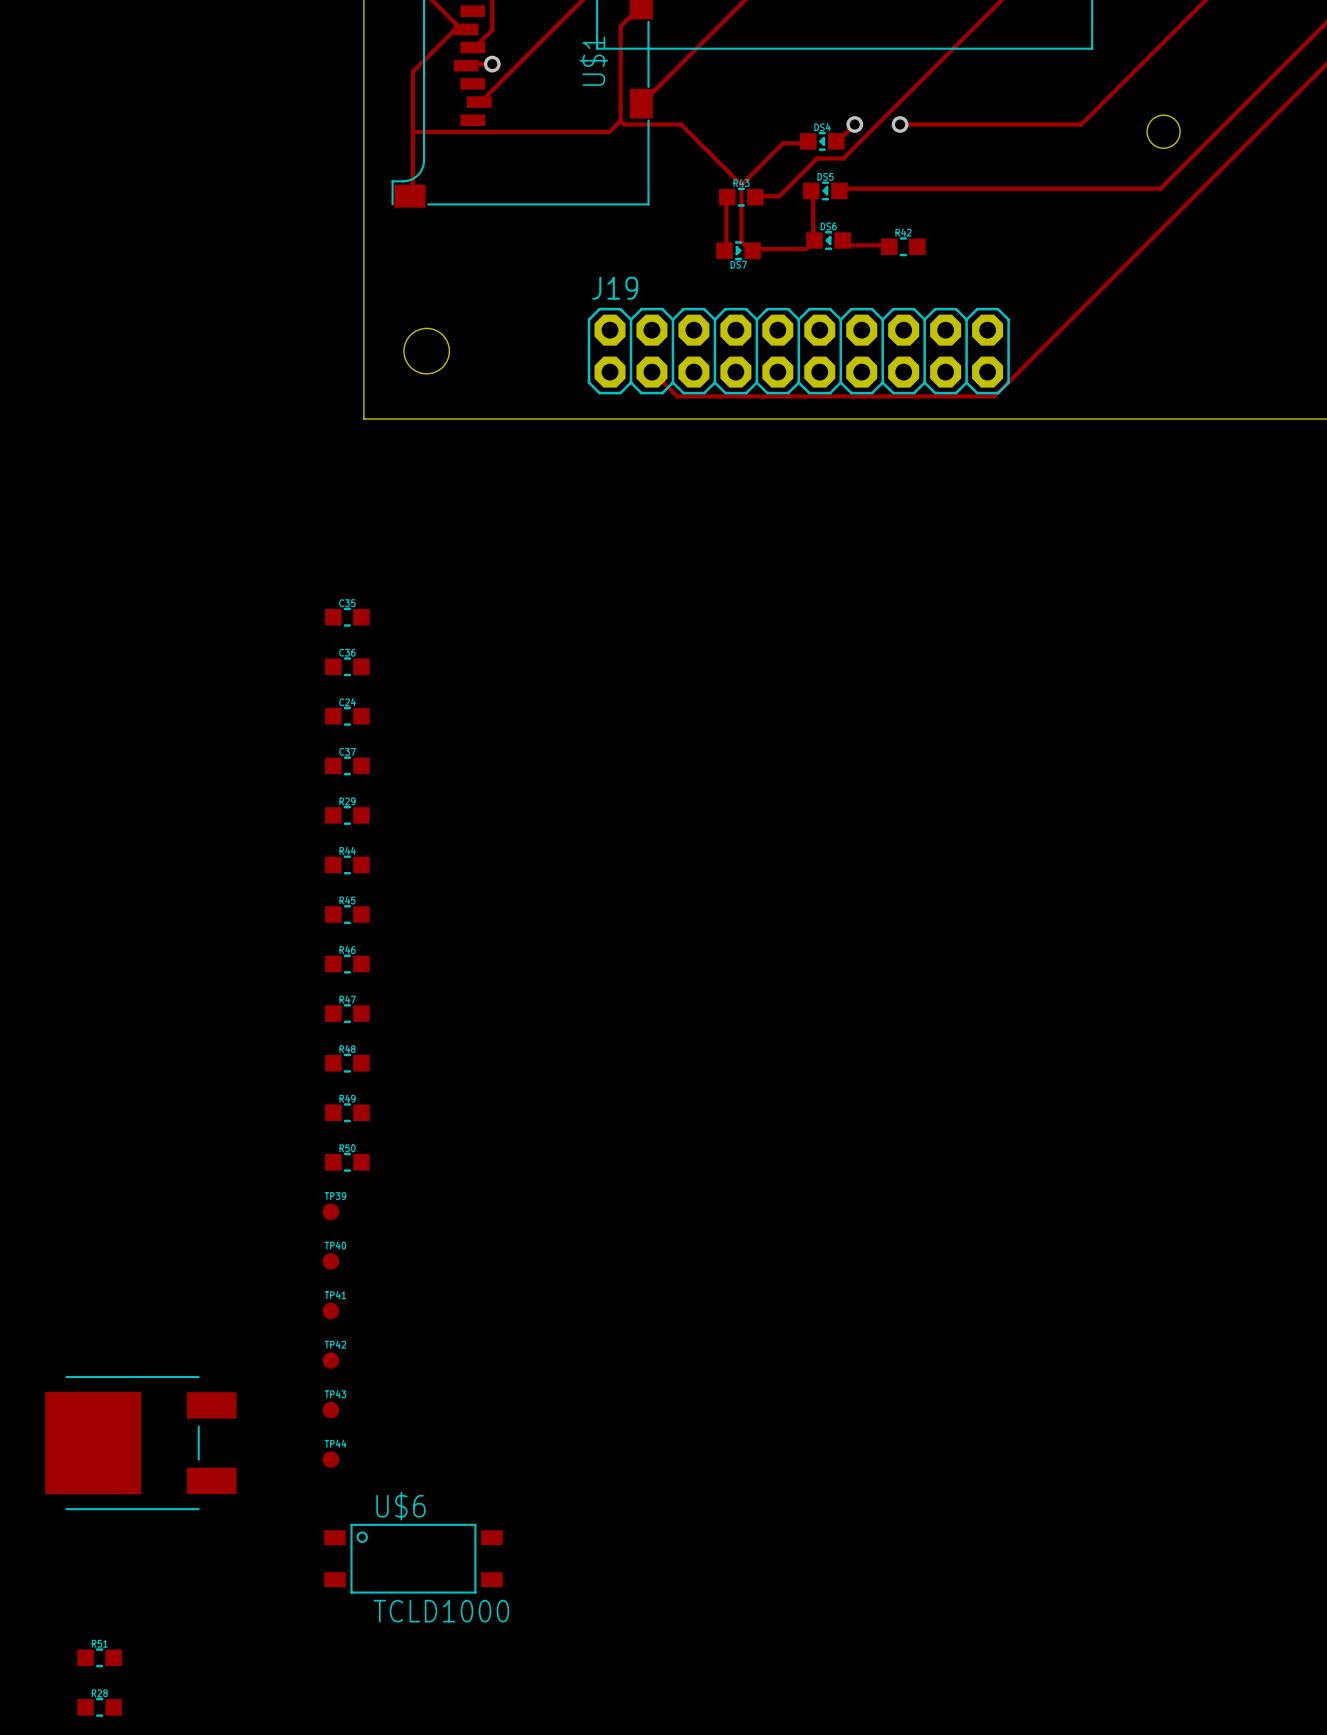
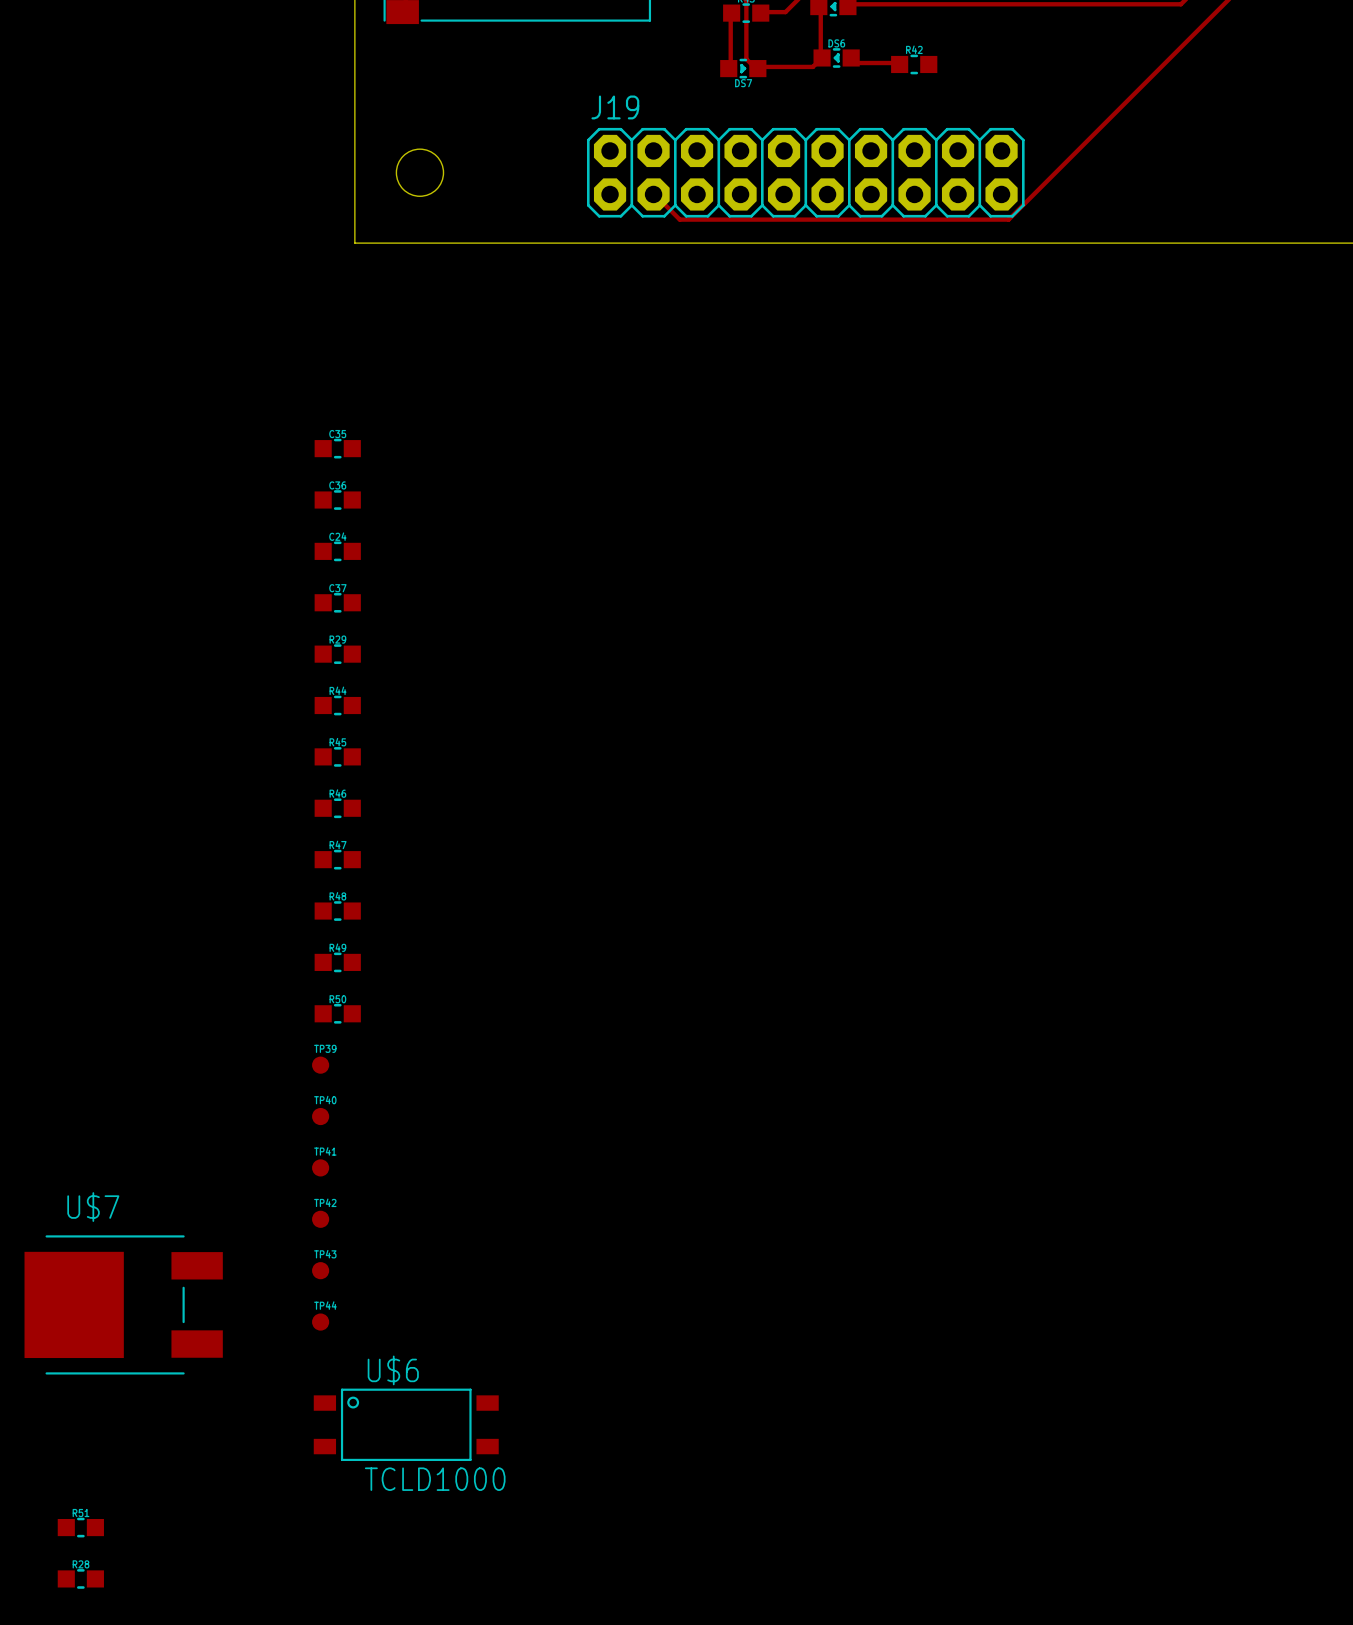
U$7 name: none -> U$7 (93, 1207)

